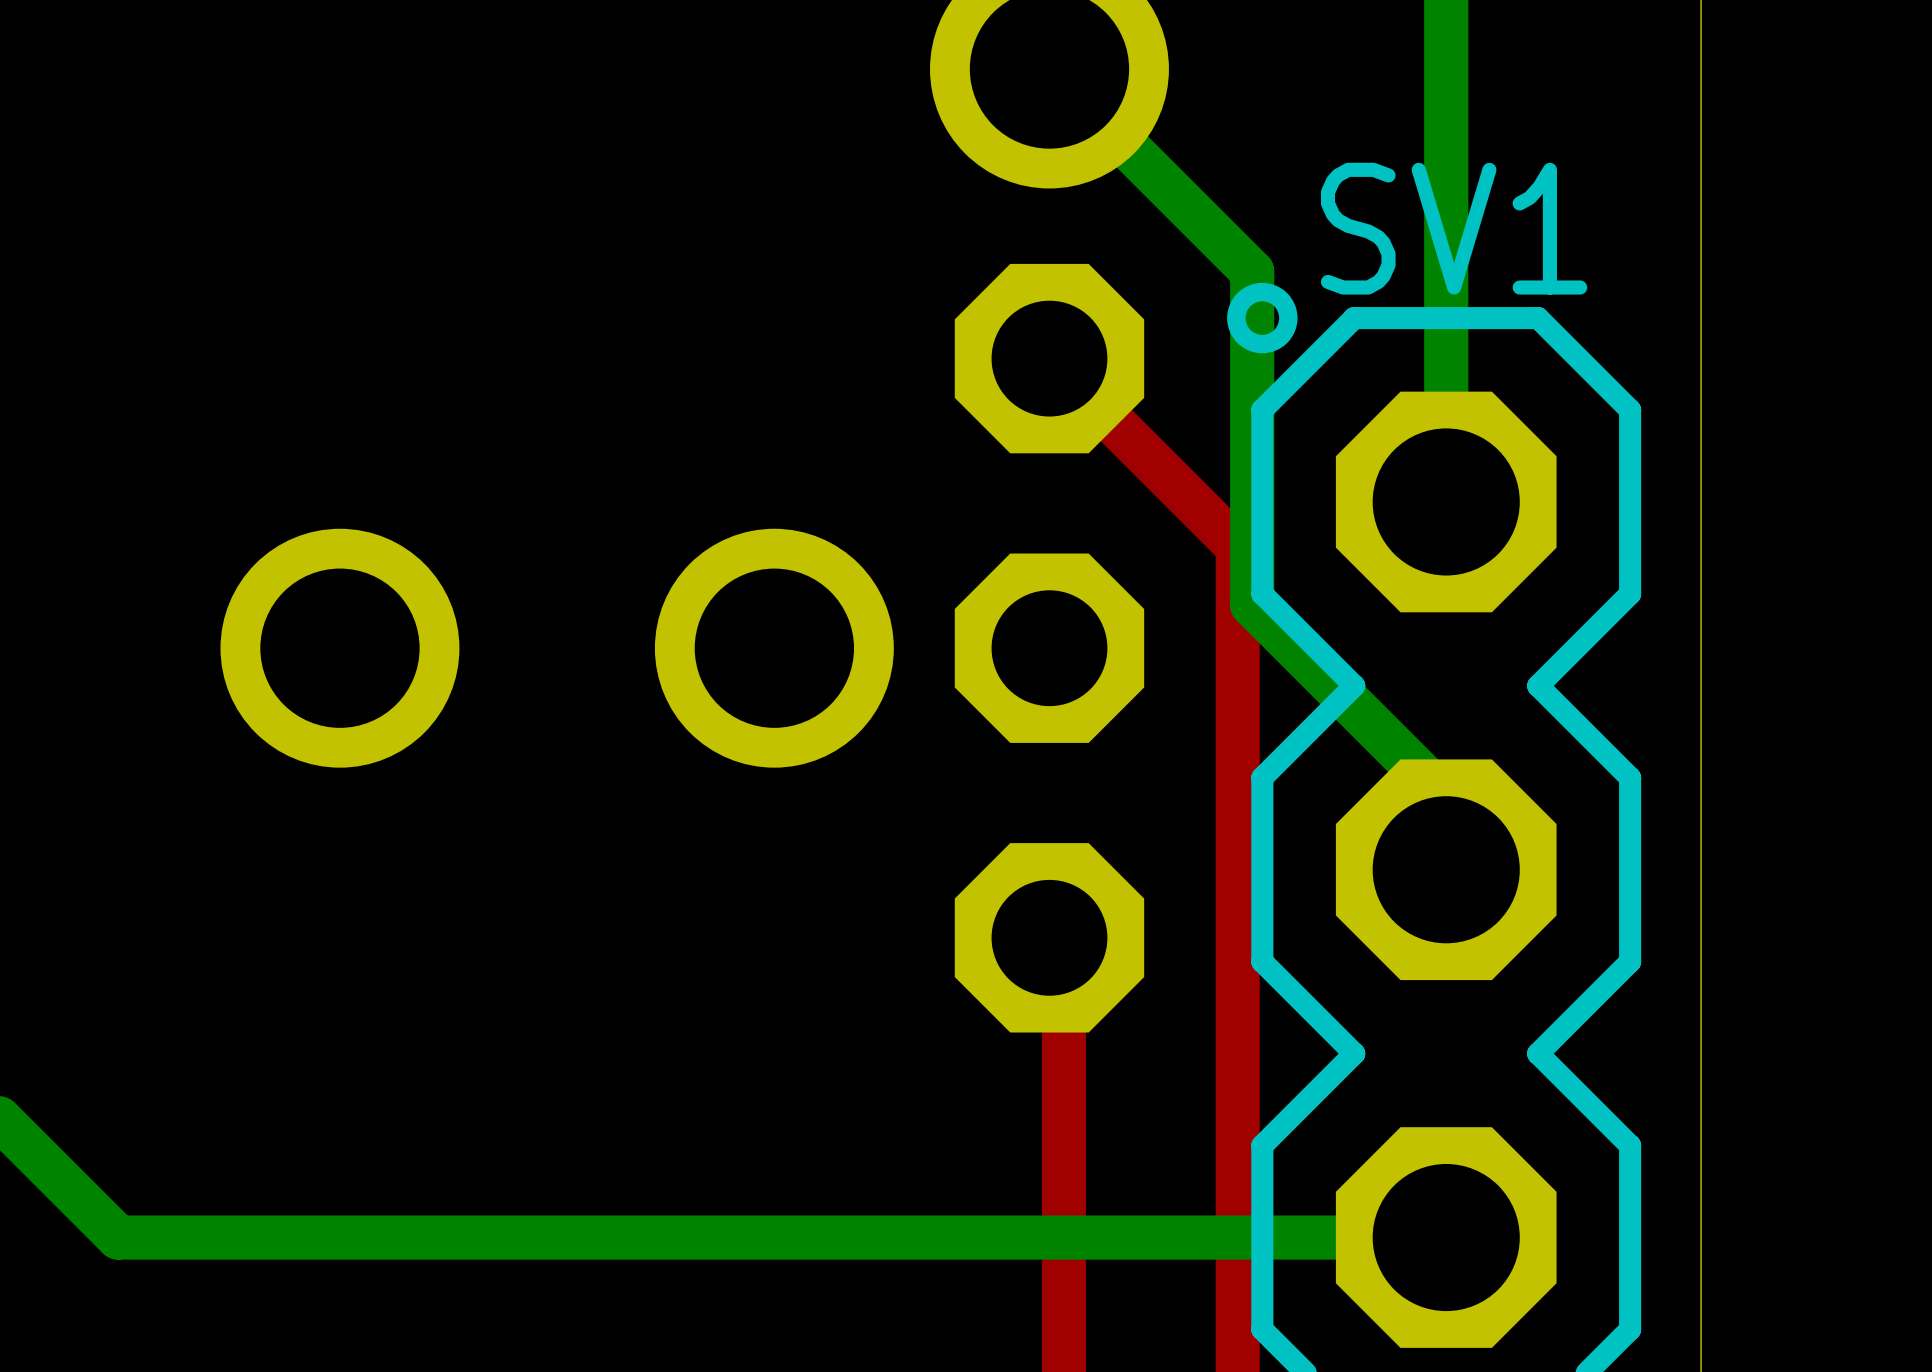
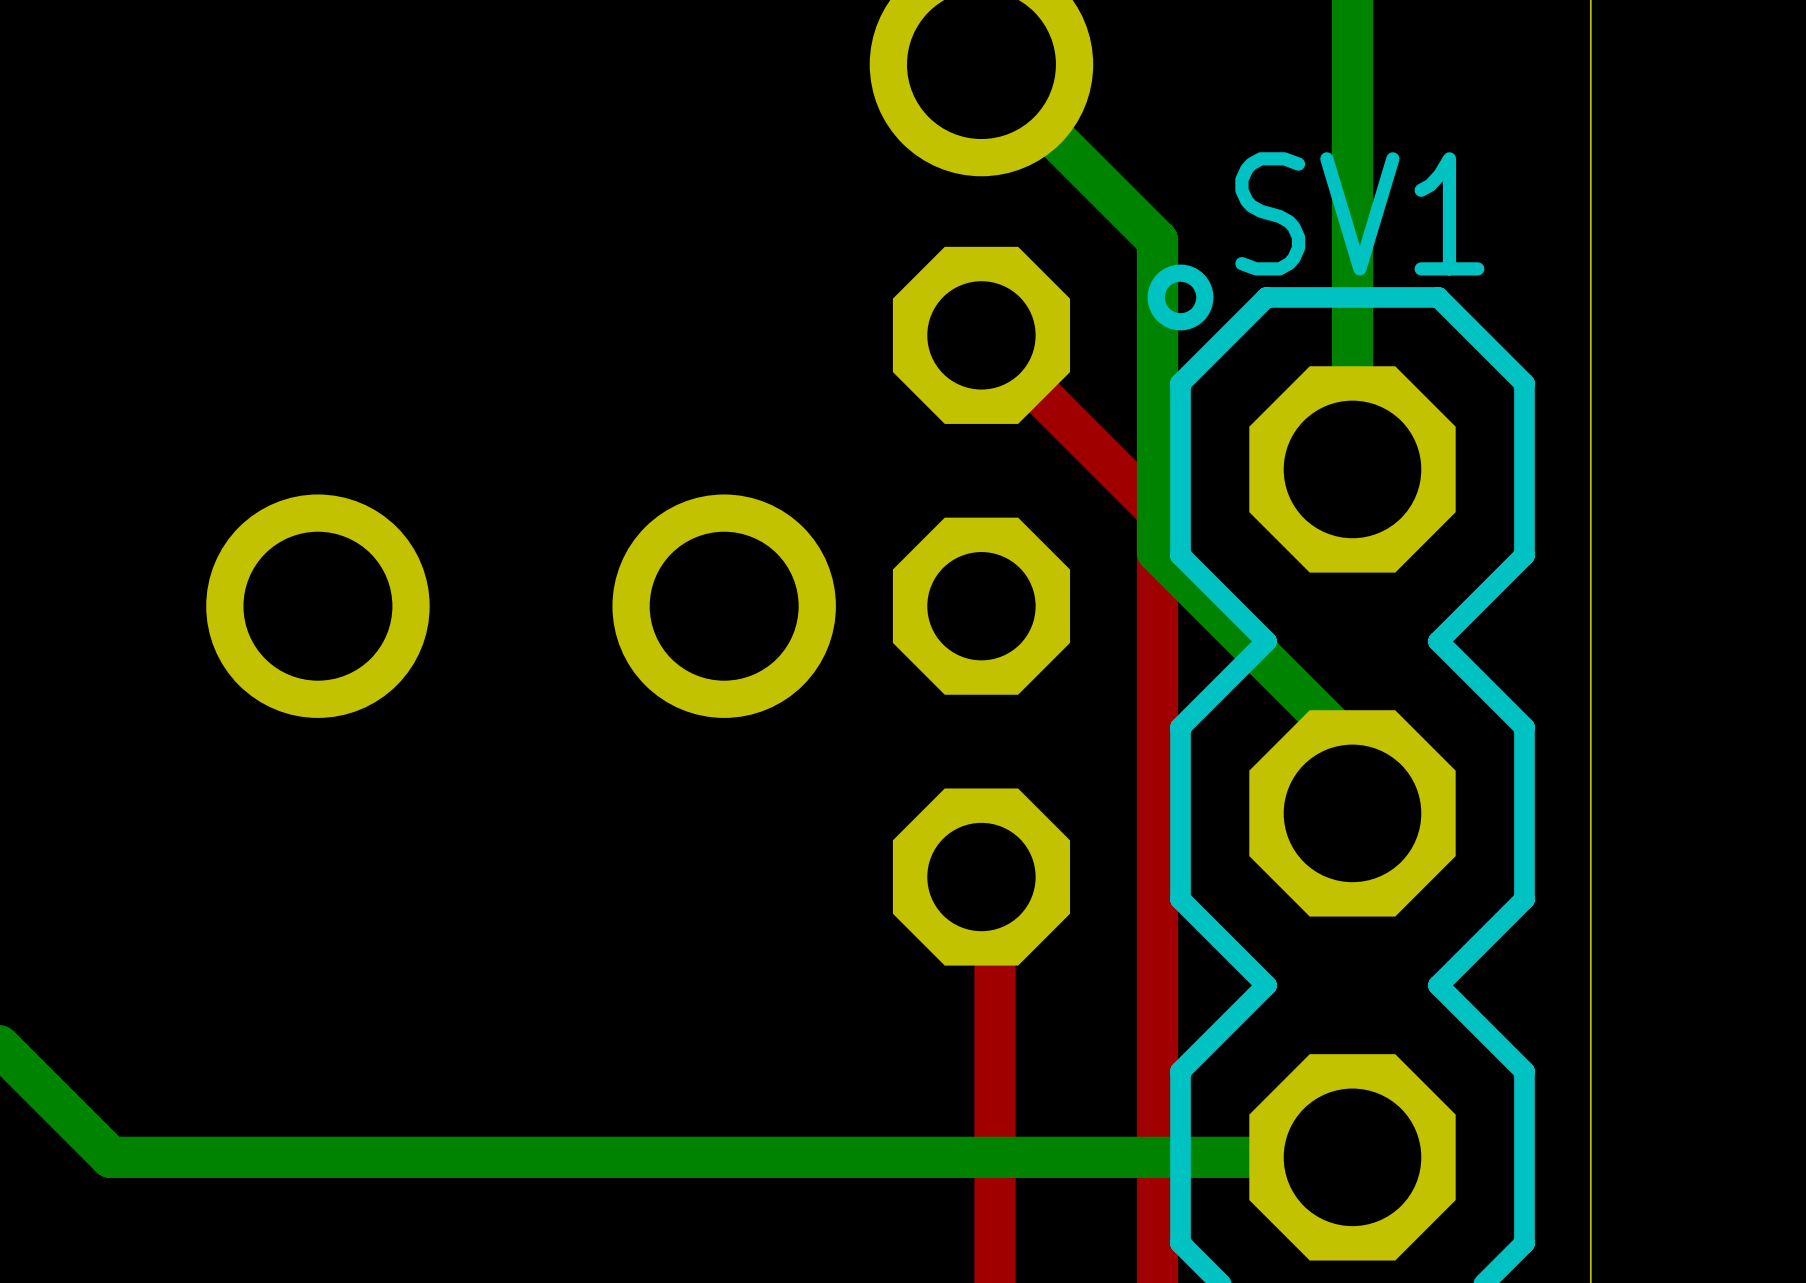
bottom track: (1237, 257) (1252, 271) (1252, 604) -> (1157, 240) (1157, 552) (1171, 565)

